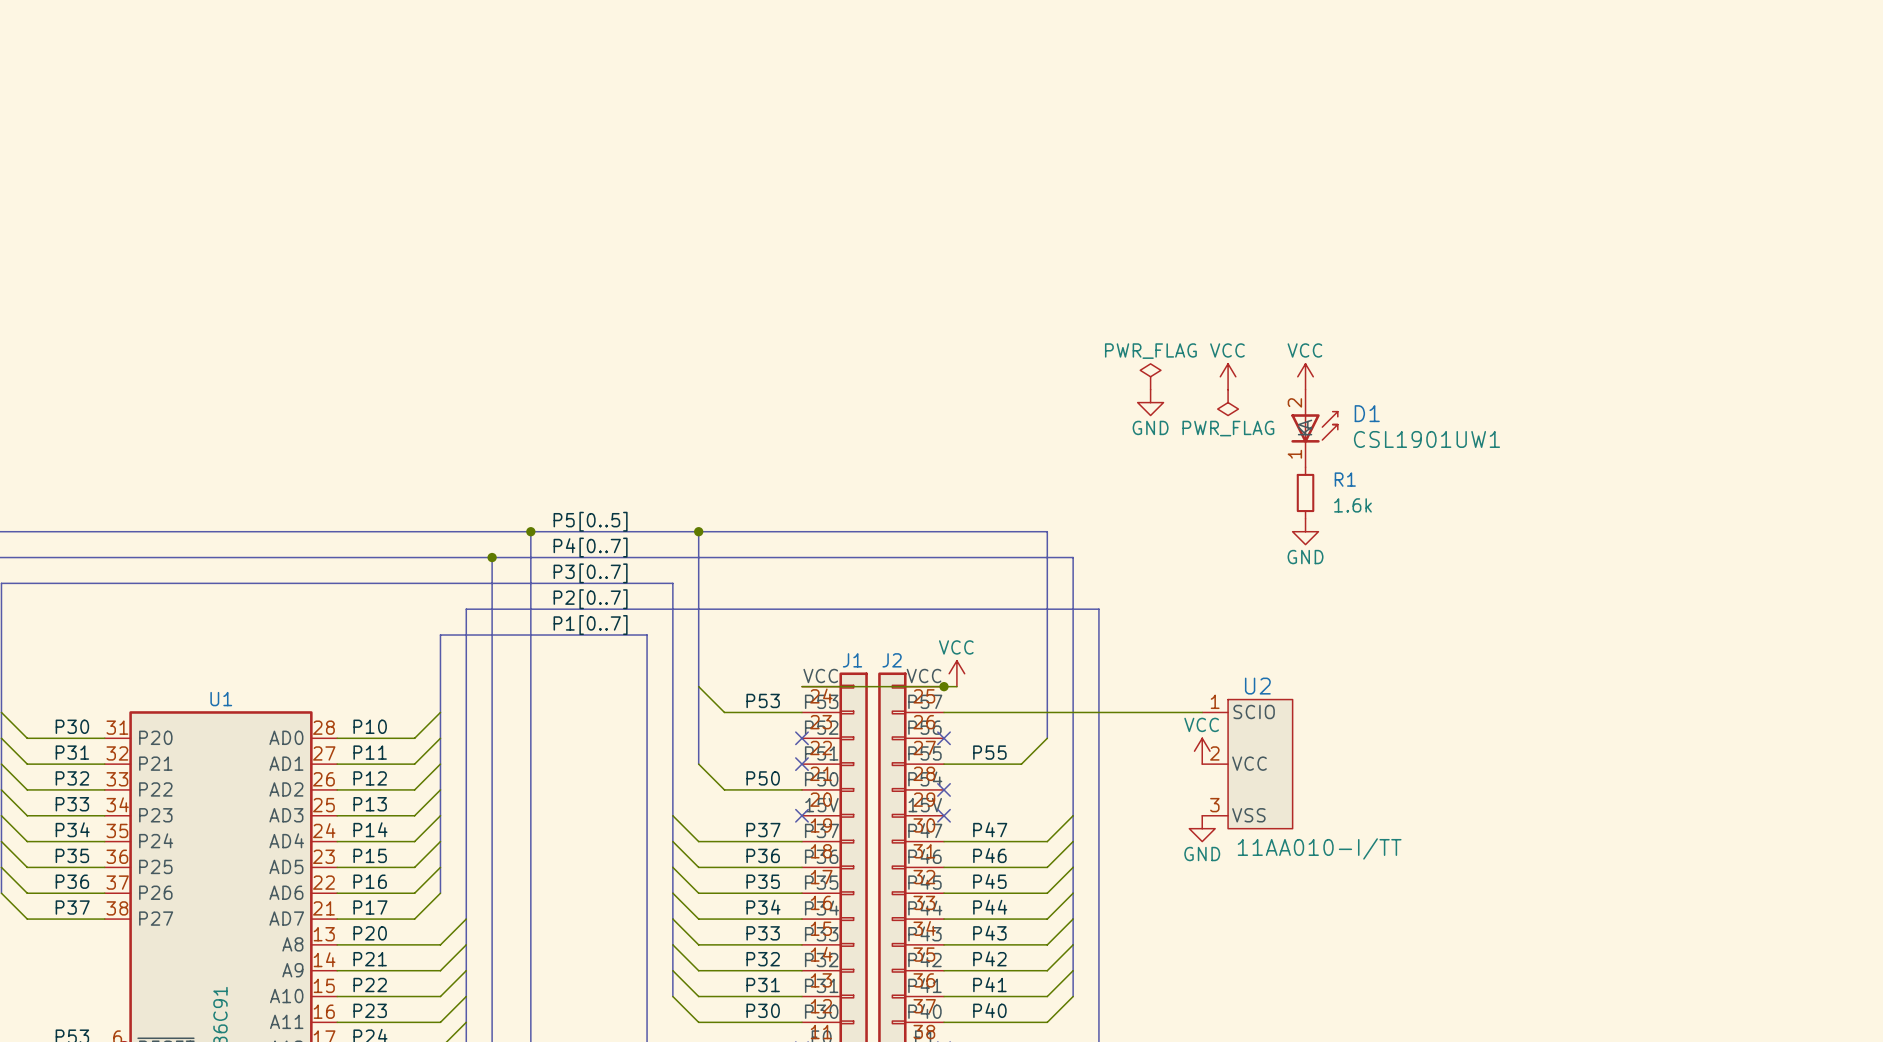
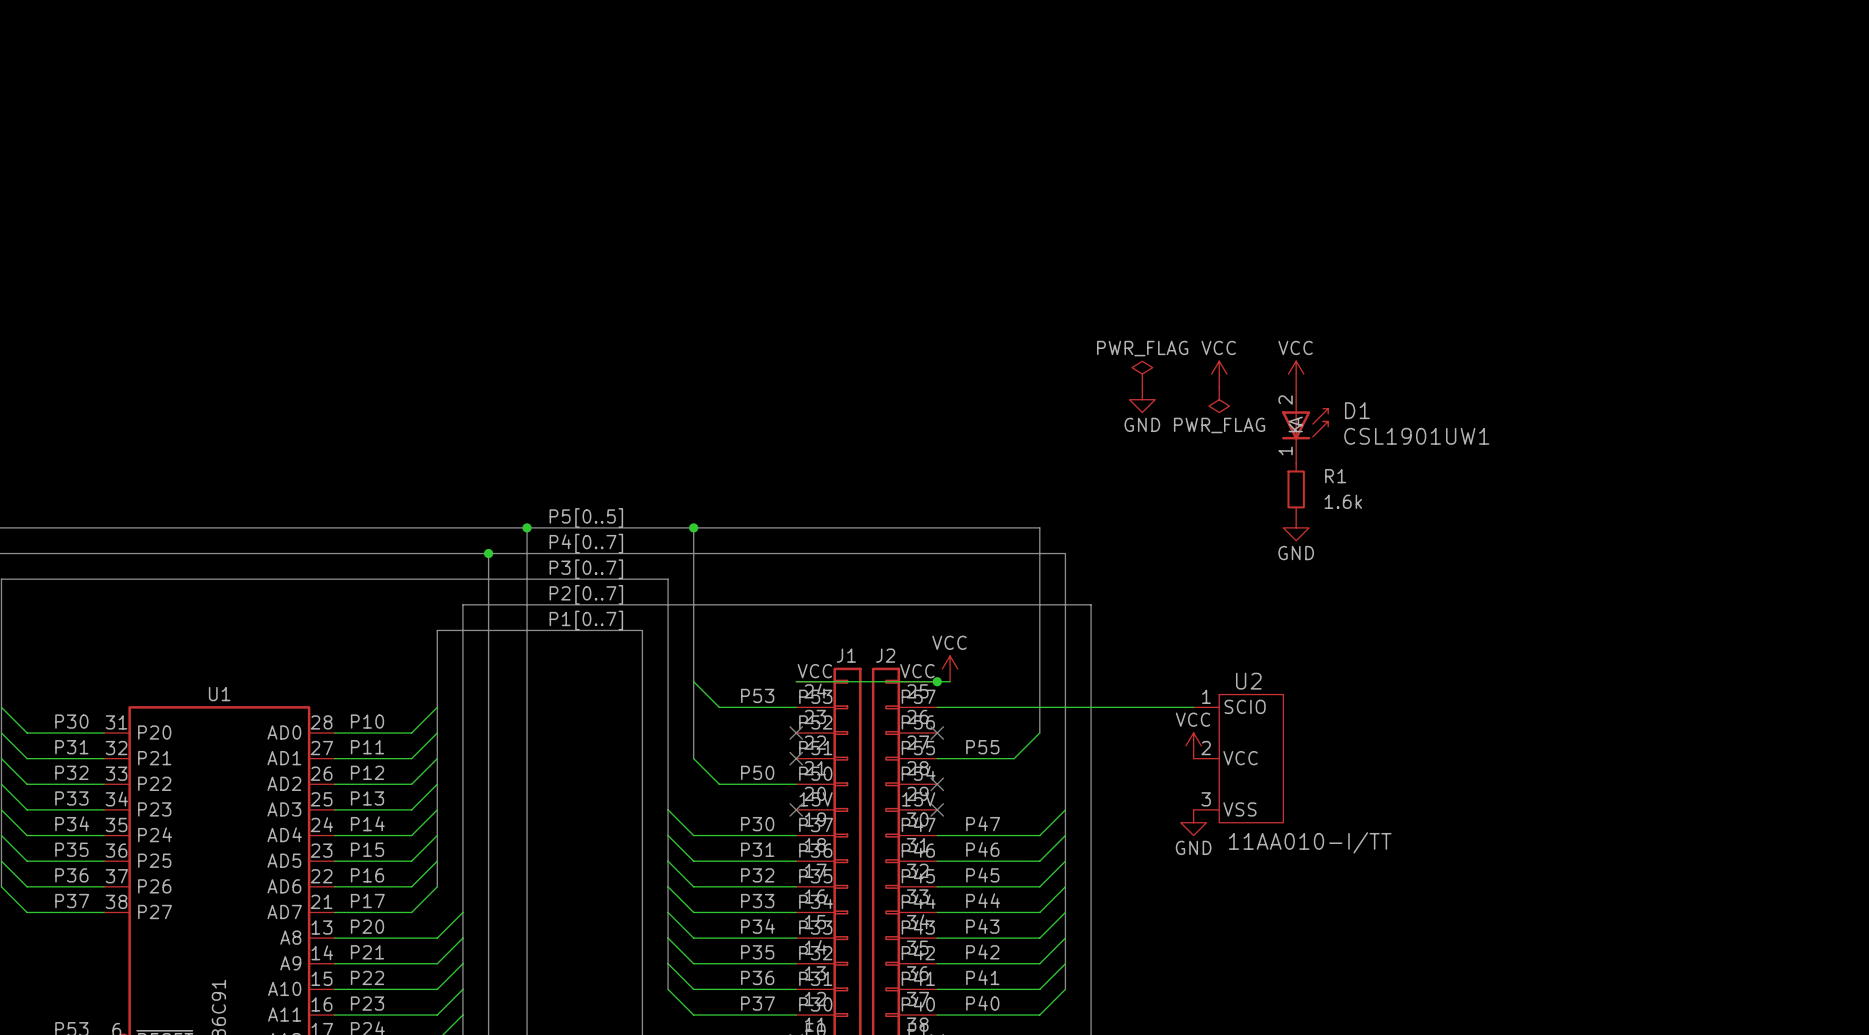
label: P37 (763, 830) -> P30 (757, 824)
label: P36 (763, 855) -> P31 (757, 849)
label: P35 (763, 881) -> P32 (757, 875)
label: P34 (763, 907) -> P33 (757, 901)
label: P33 (763, 933) -> P34 (757, 926)
label: P32 (763, 959) -> P35 (757, 952)
label: P31 (763, 985) -> P36 (757, 977)
label: P30 (763, 1010) -> P37 (757, 1003)

